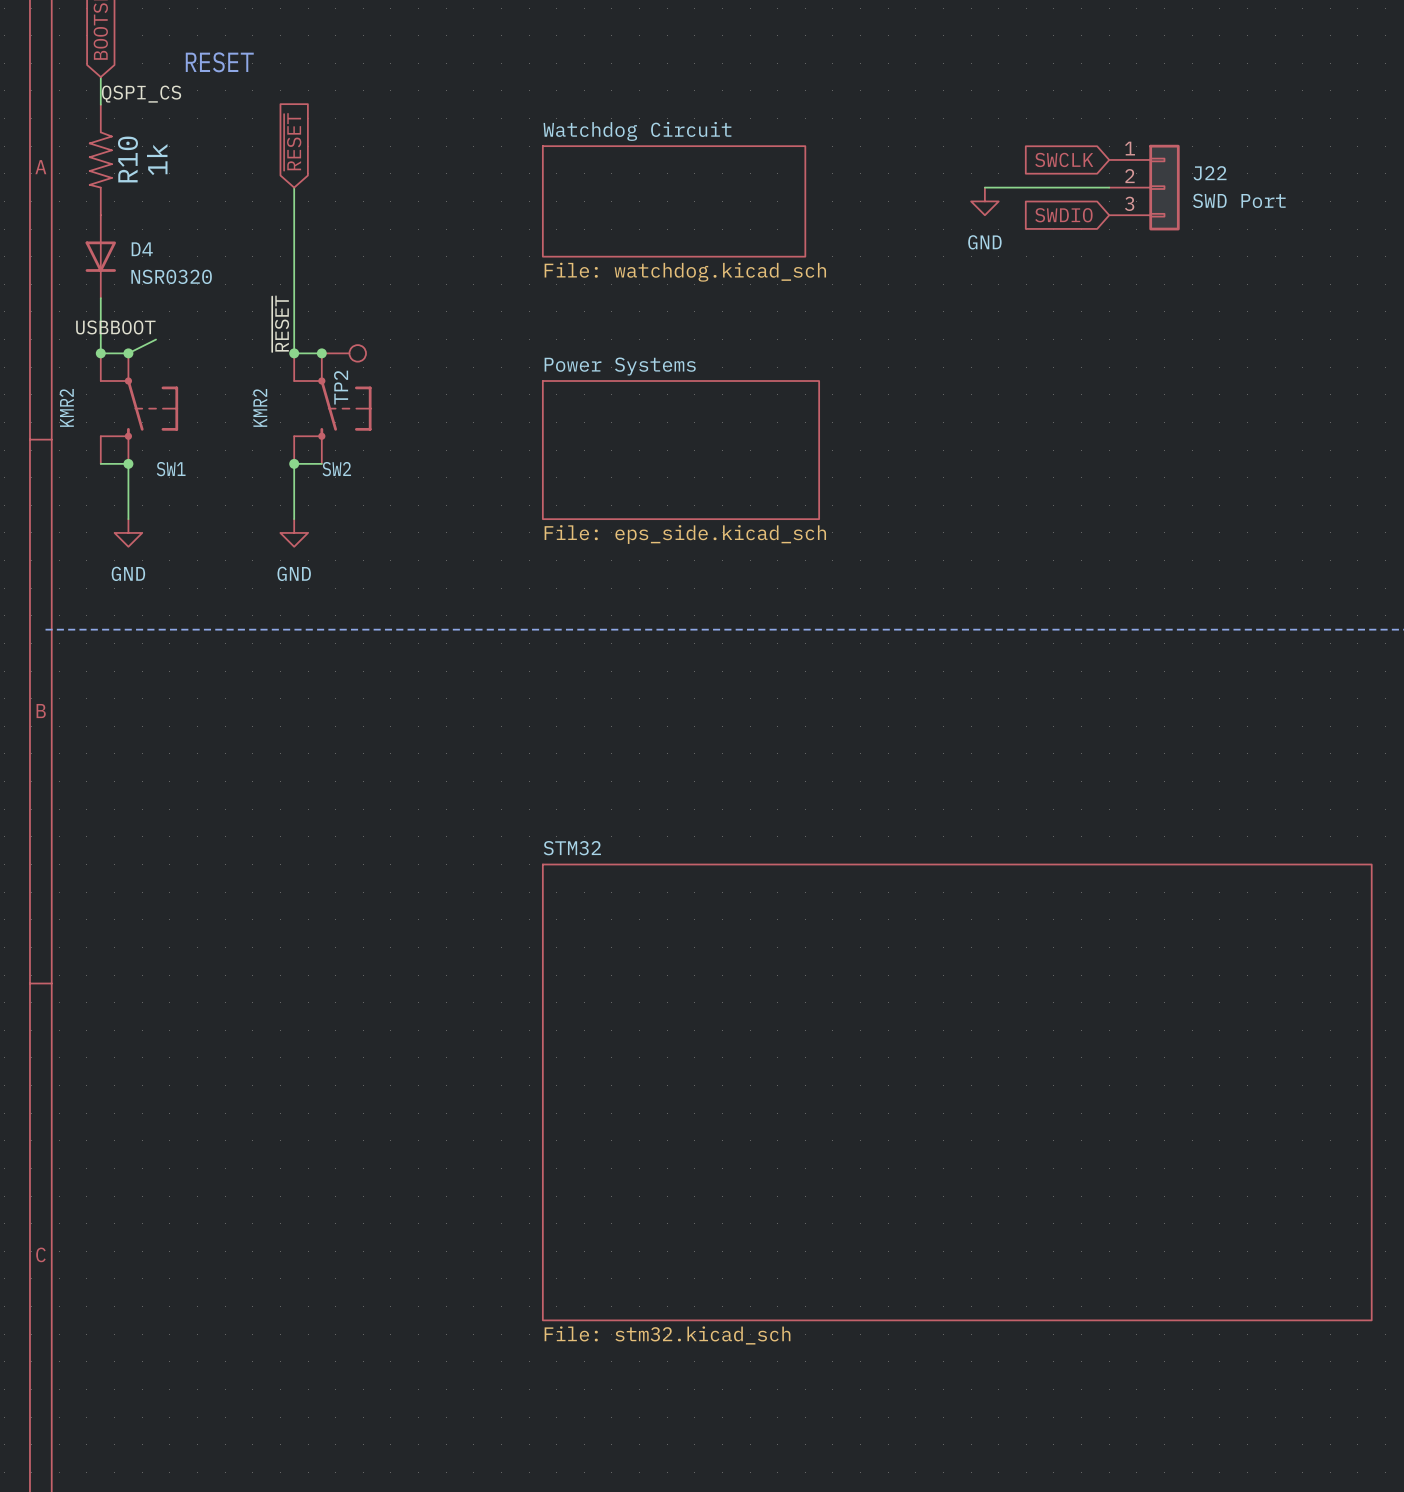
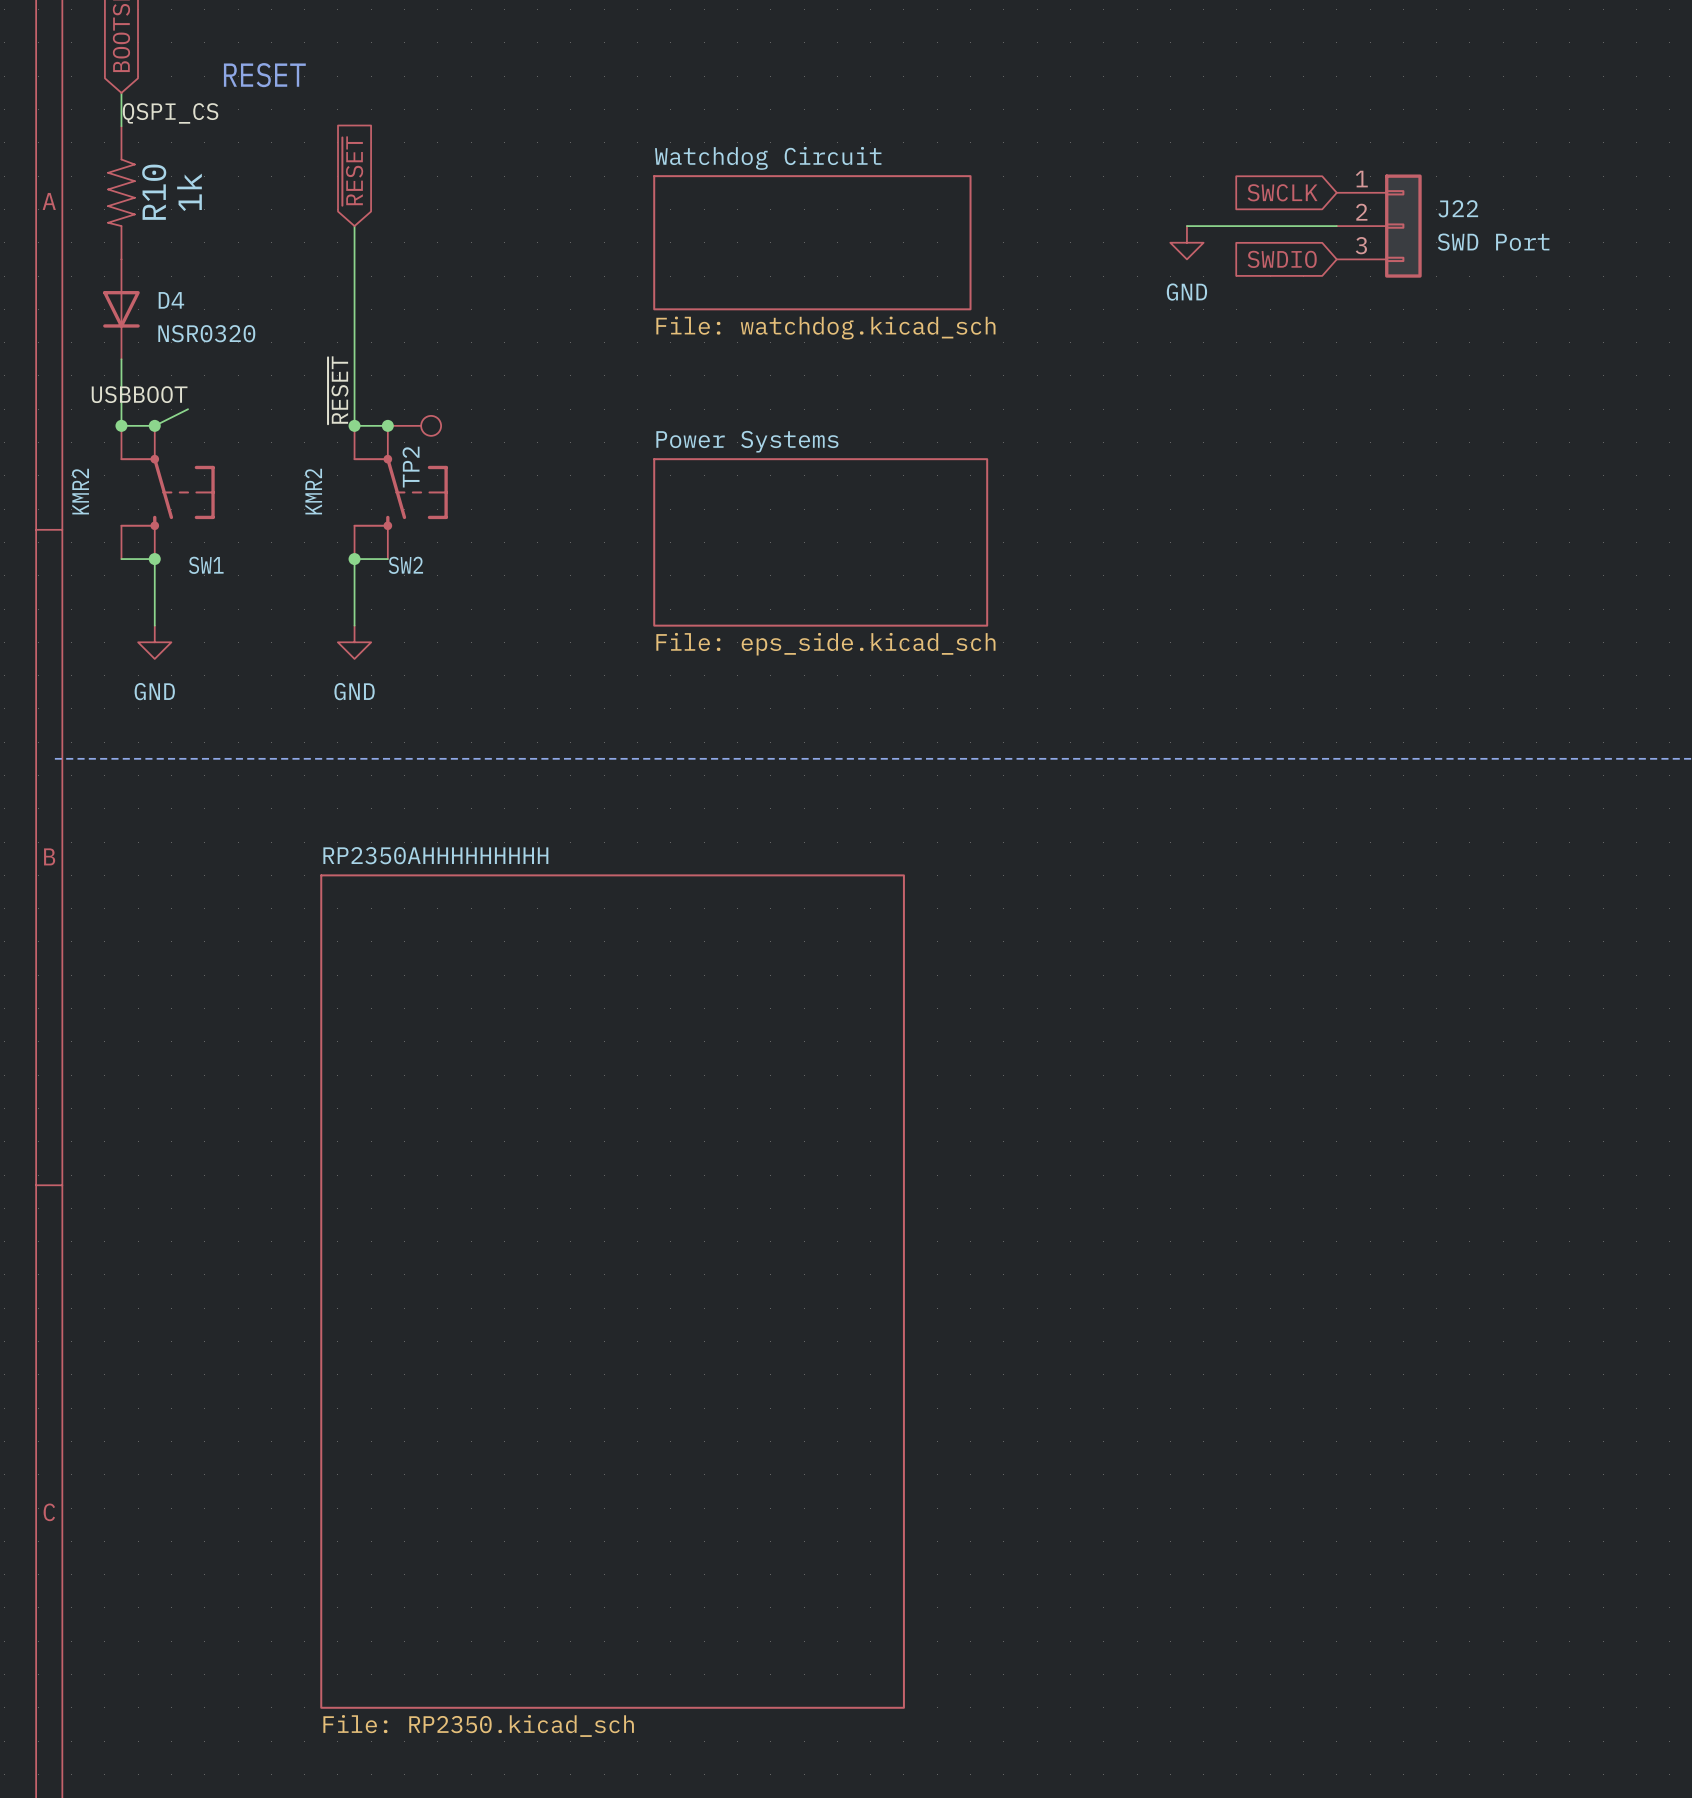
sheet RP2350AHHHHHHHHH: none -> File: RP2350.kicad_sch (612, 1291)
sheet STM32: File: stm32.kicad_sch (957, 1092) -> none

